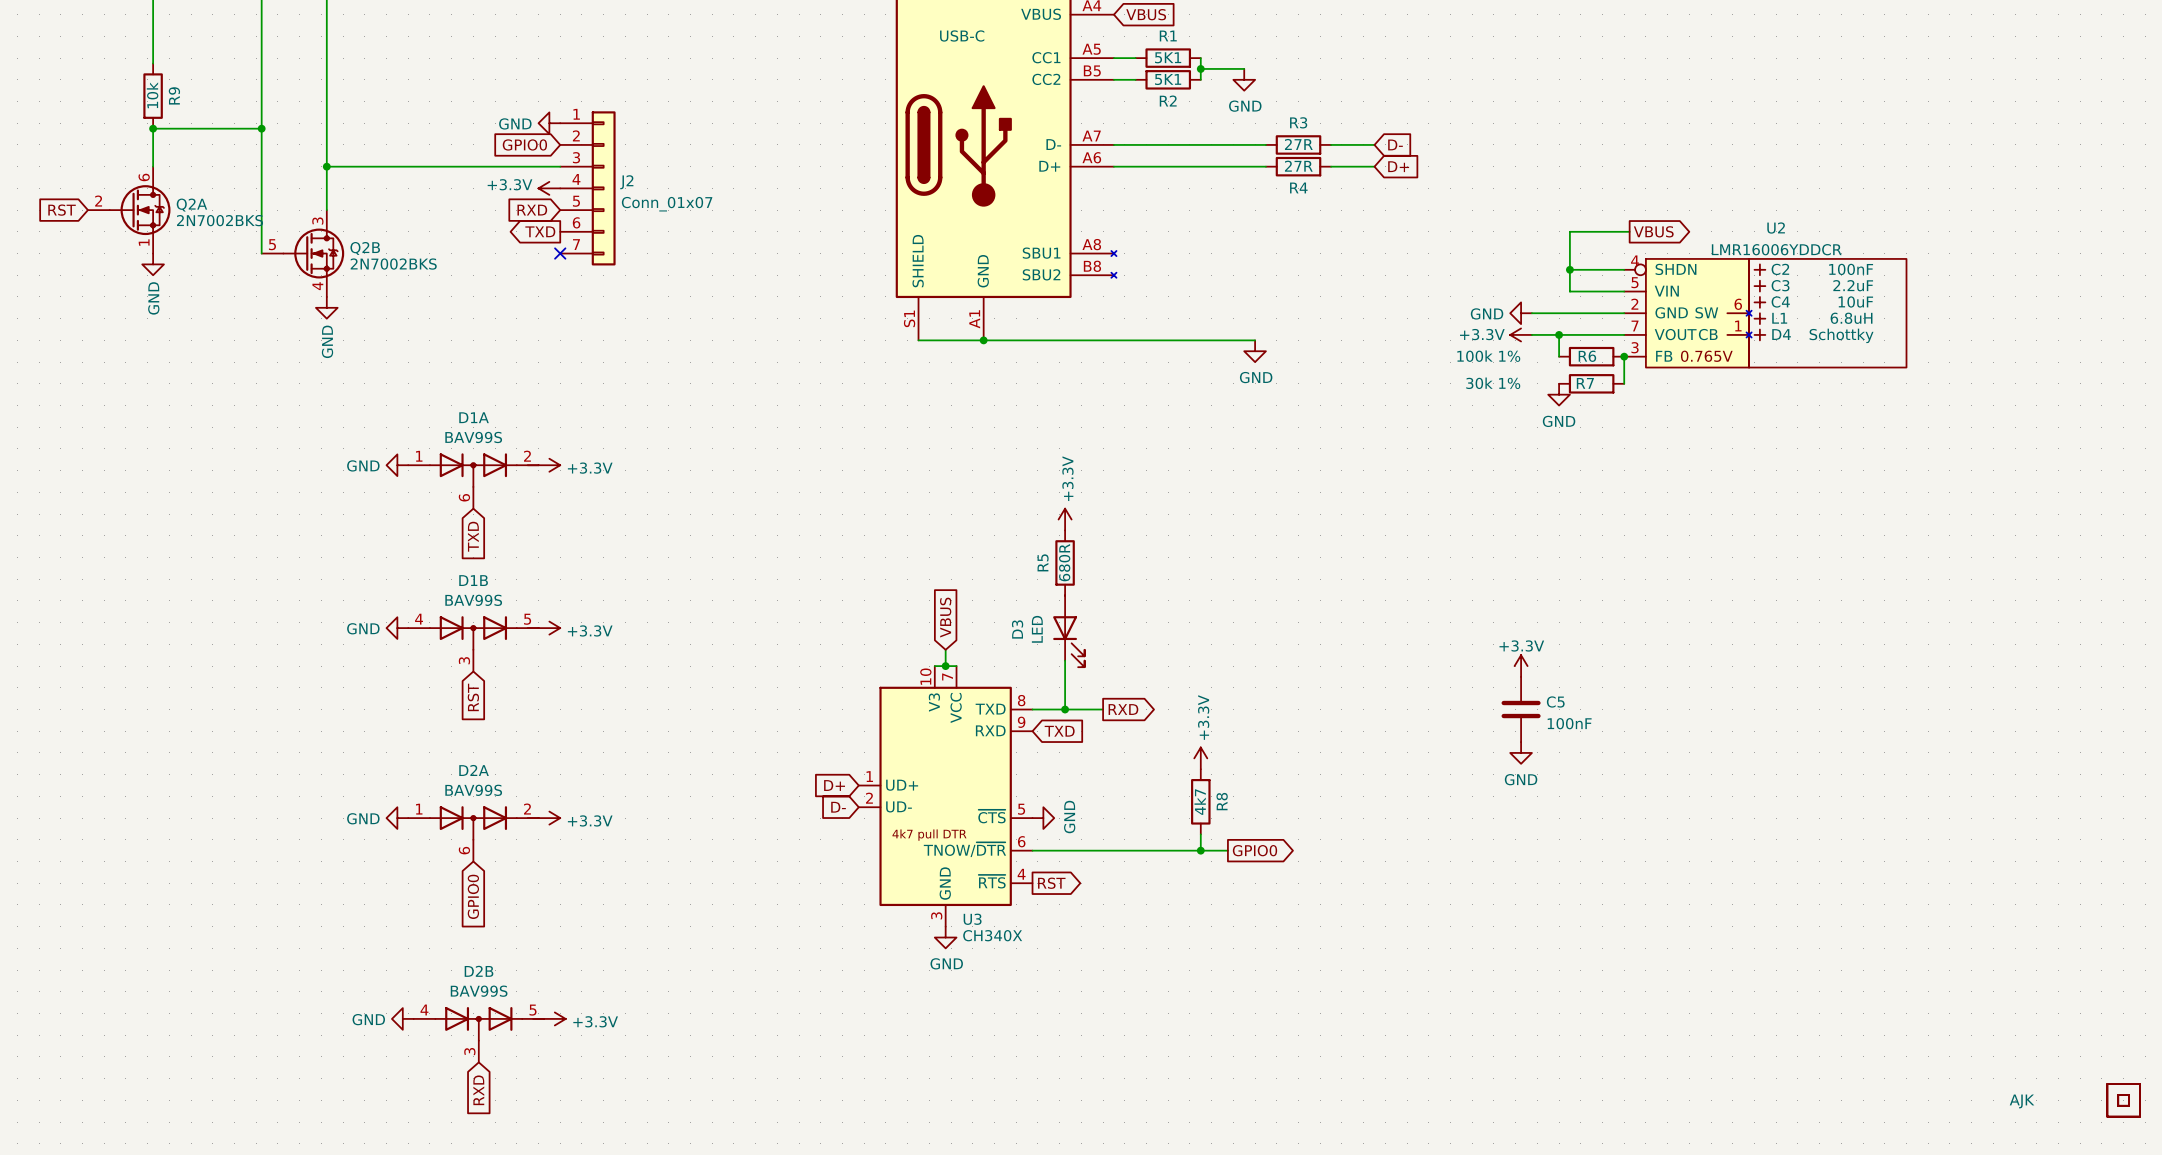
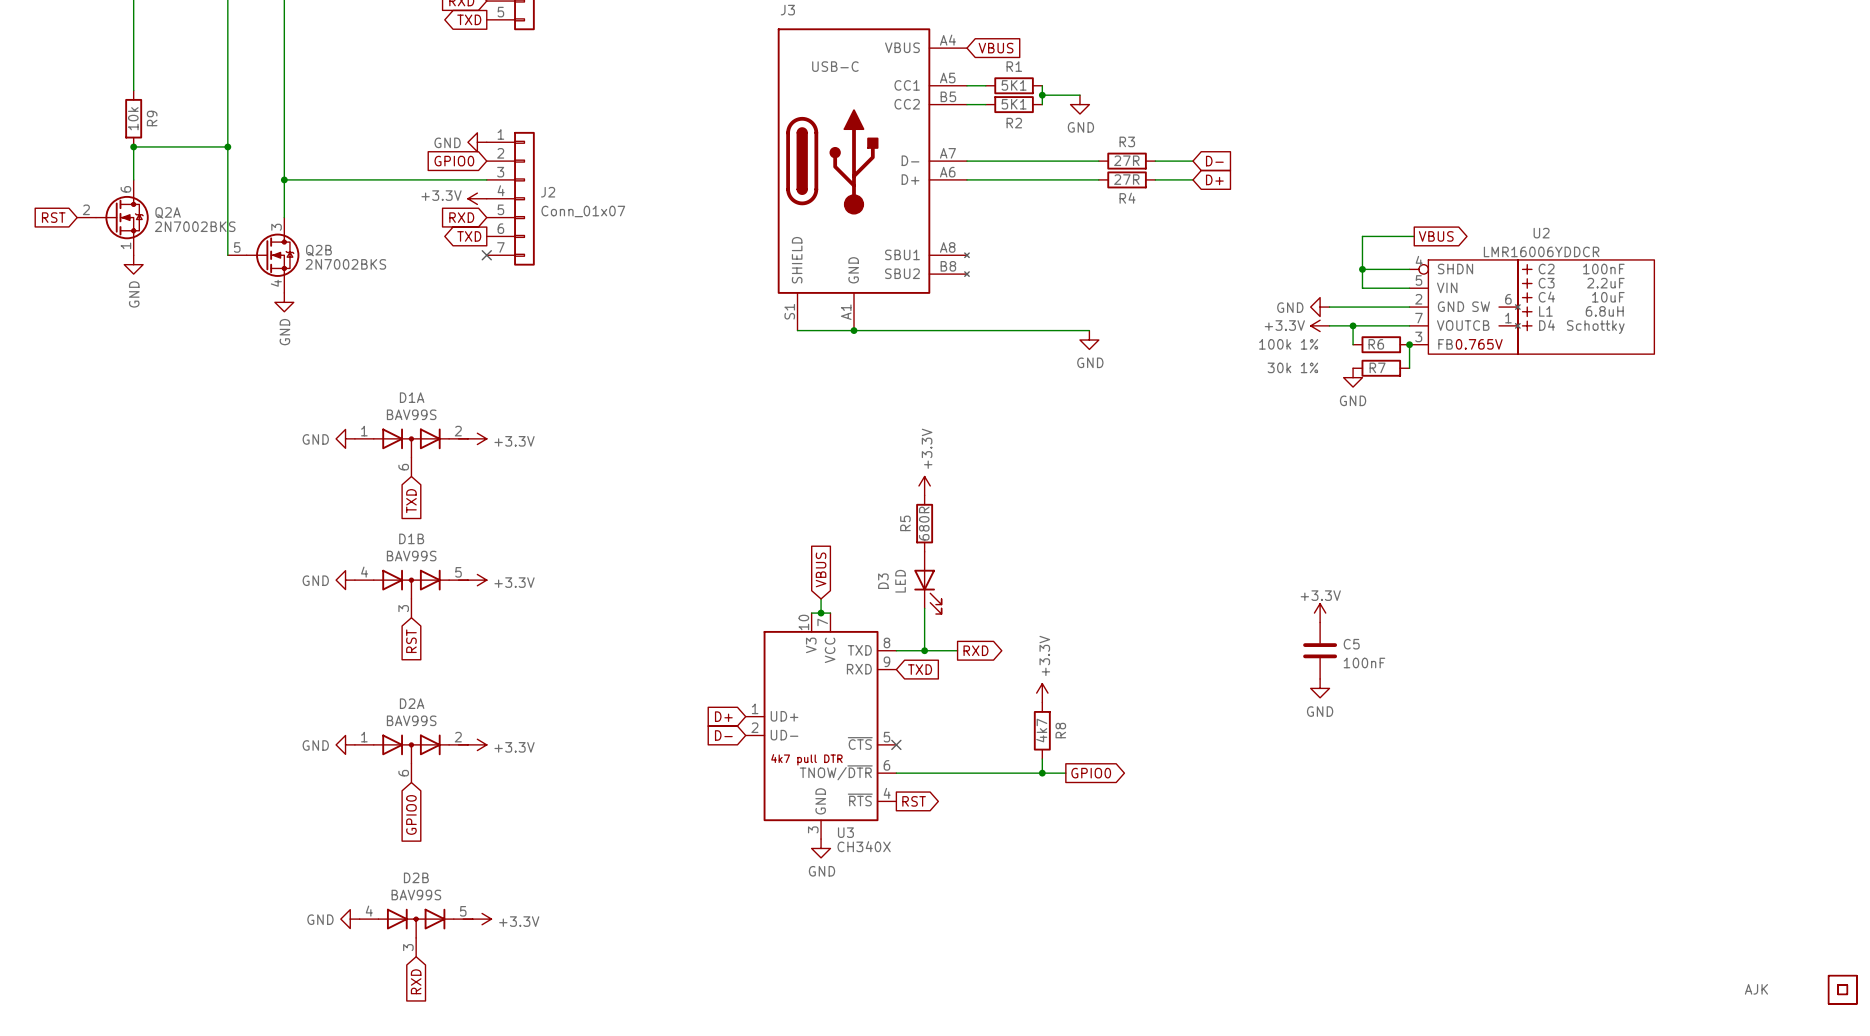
no-connect mark: none -> (896, 744)
power symbol: GND (1043, 818) -> none

